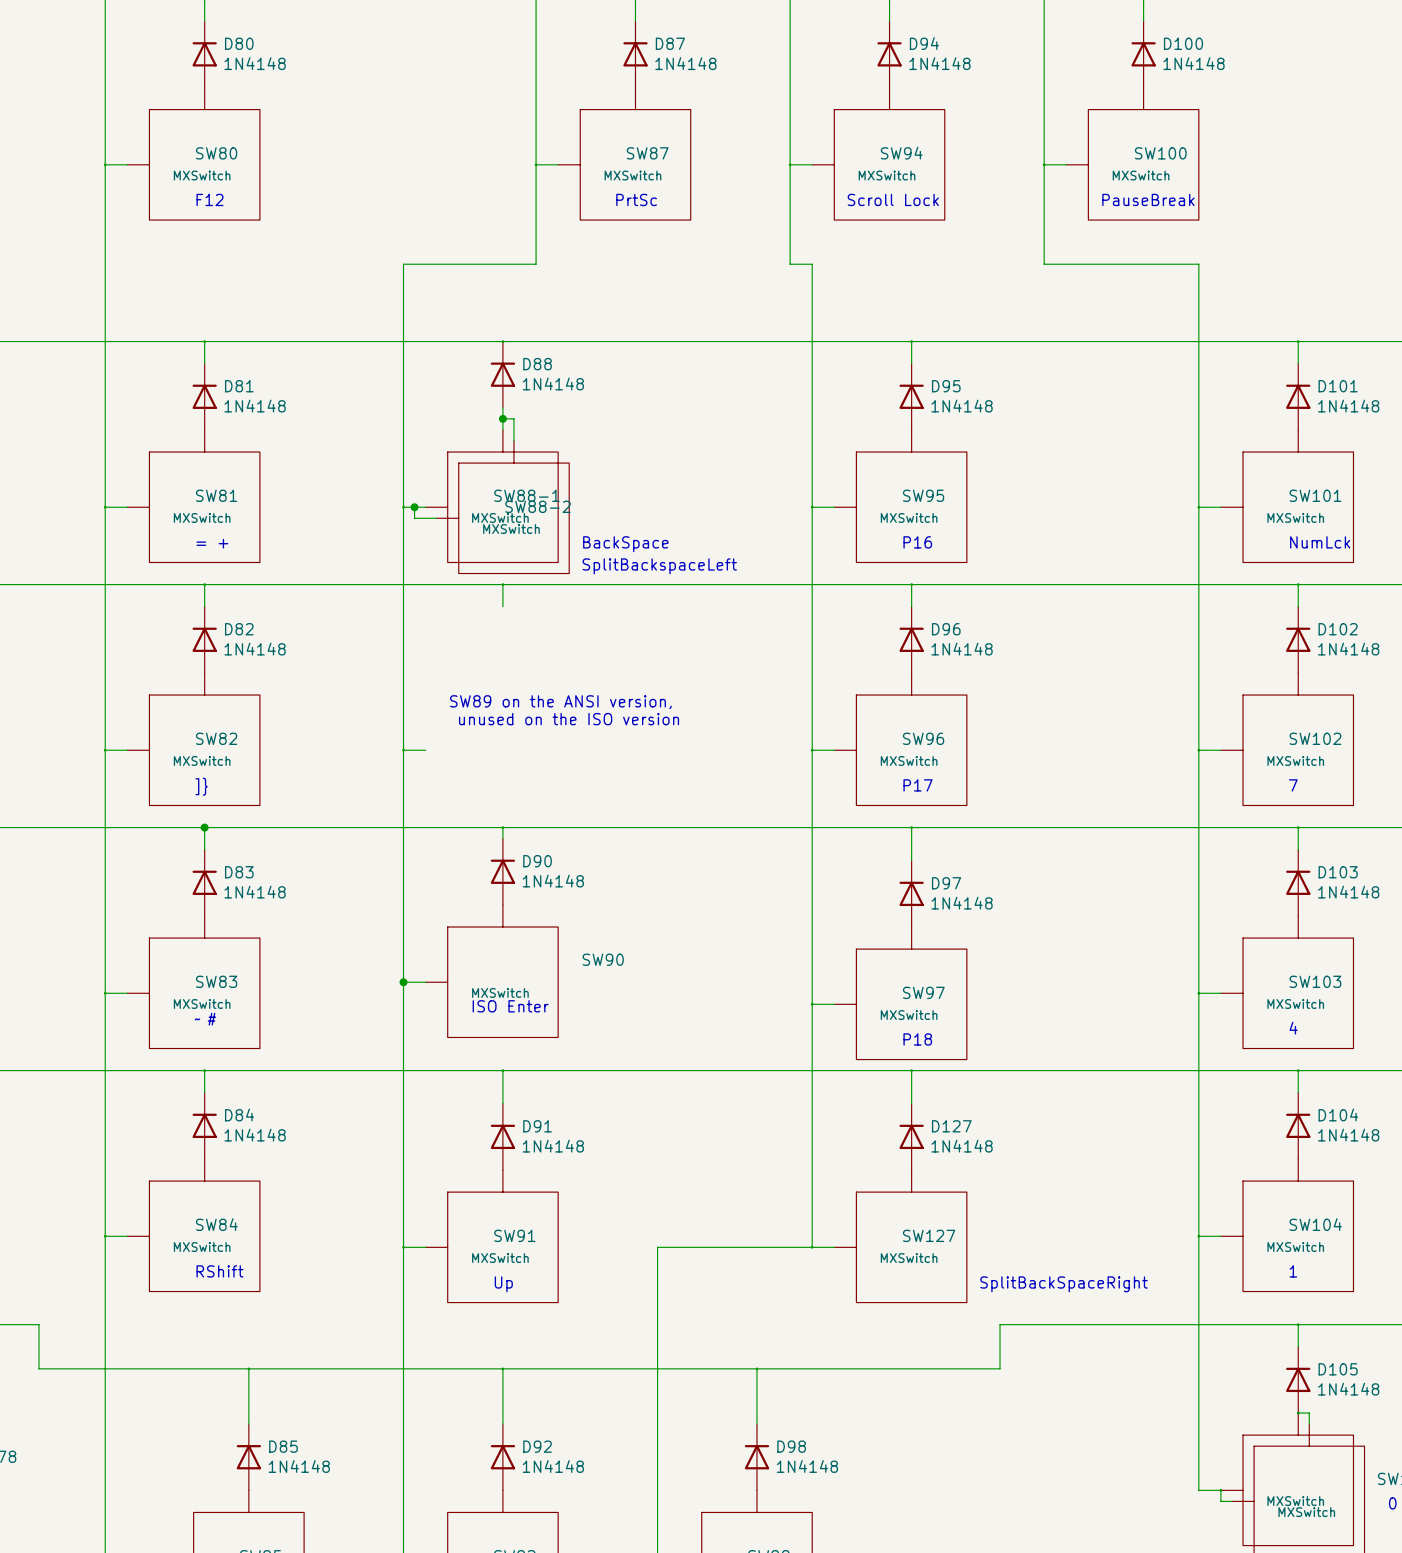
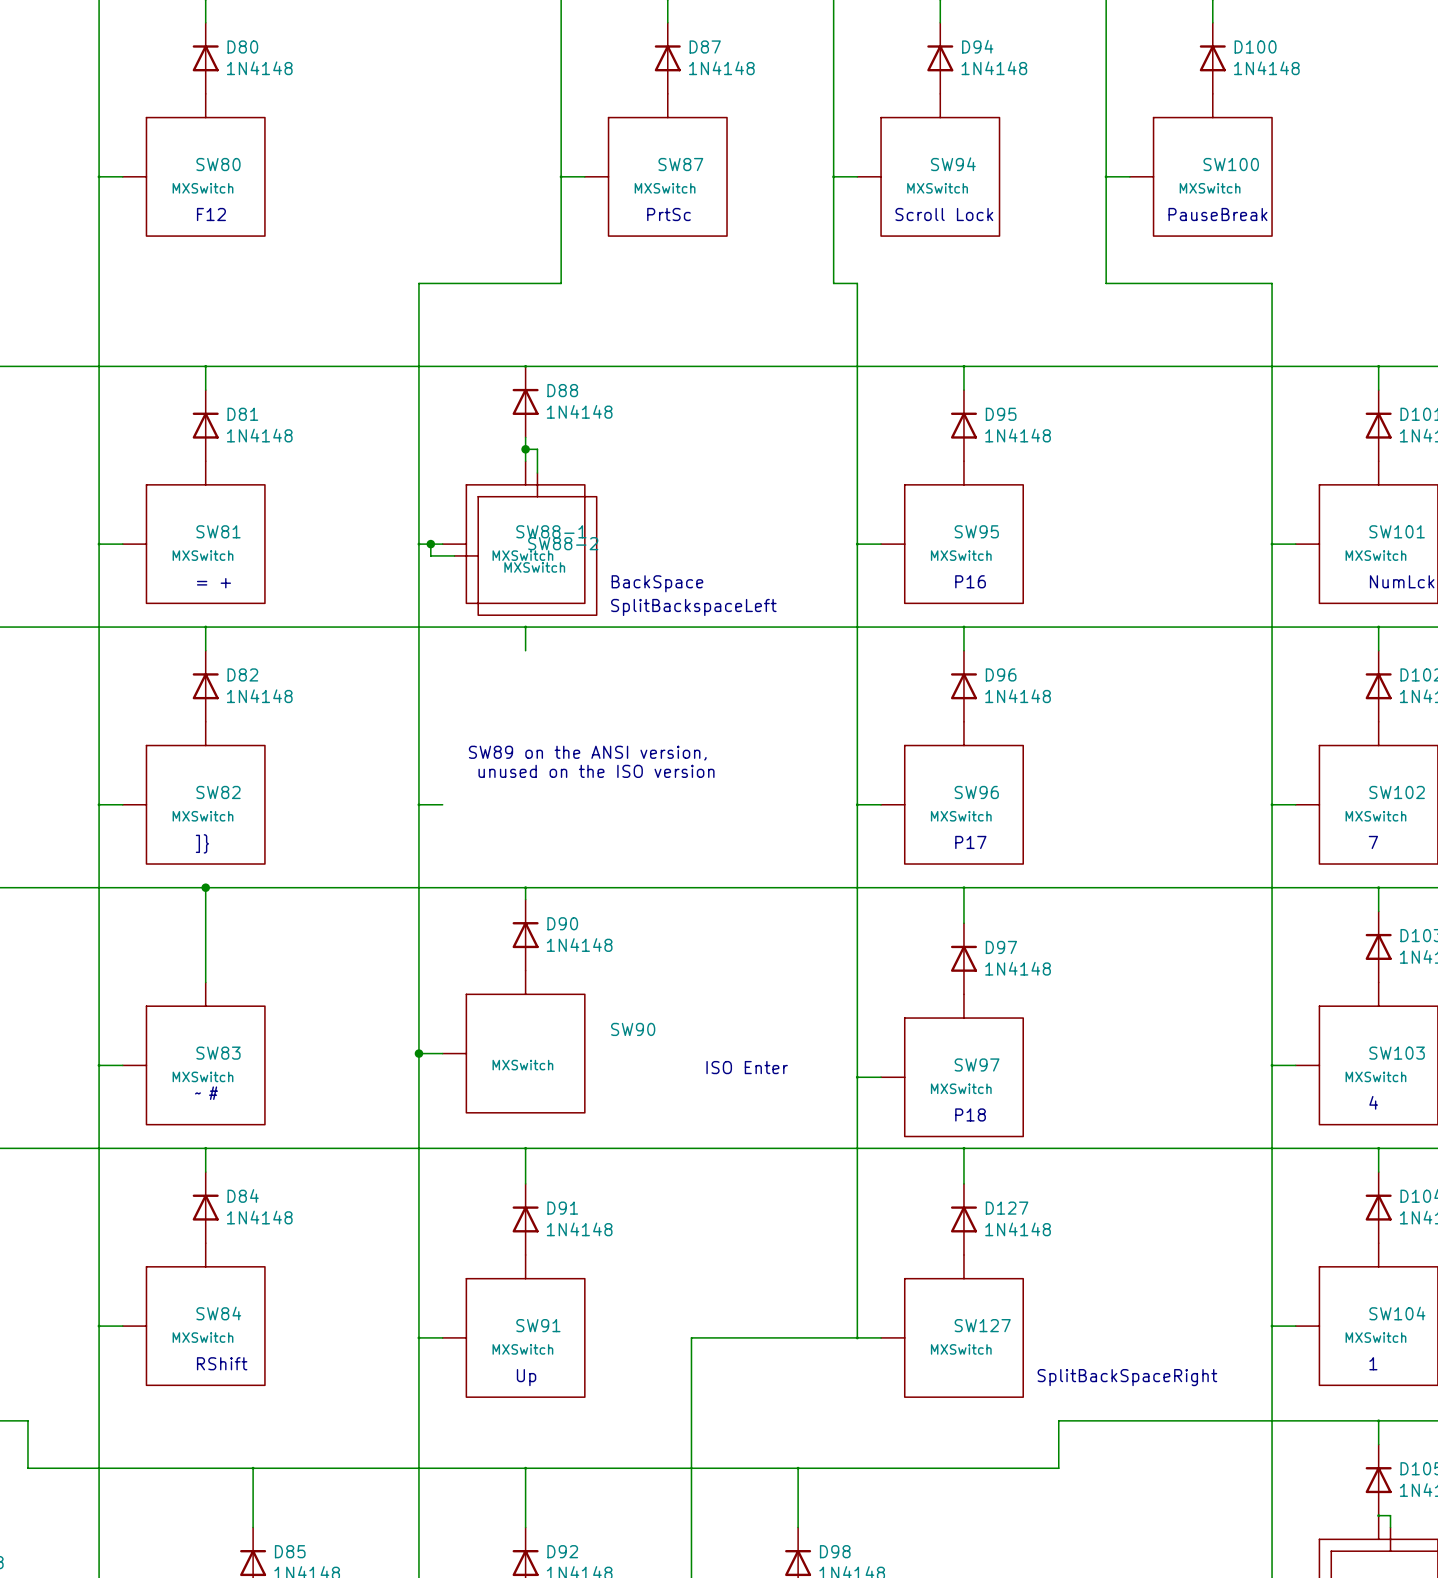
D83: 1N4148 (204, 882) -> none
text position: ISO Enter (510, 1006) -> ISO Enter (747, 1067)

